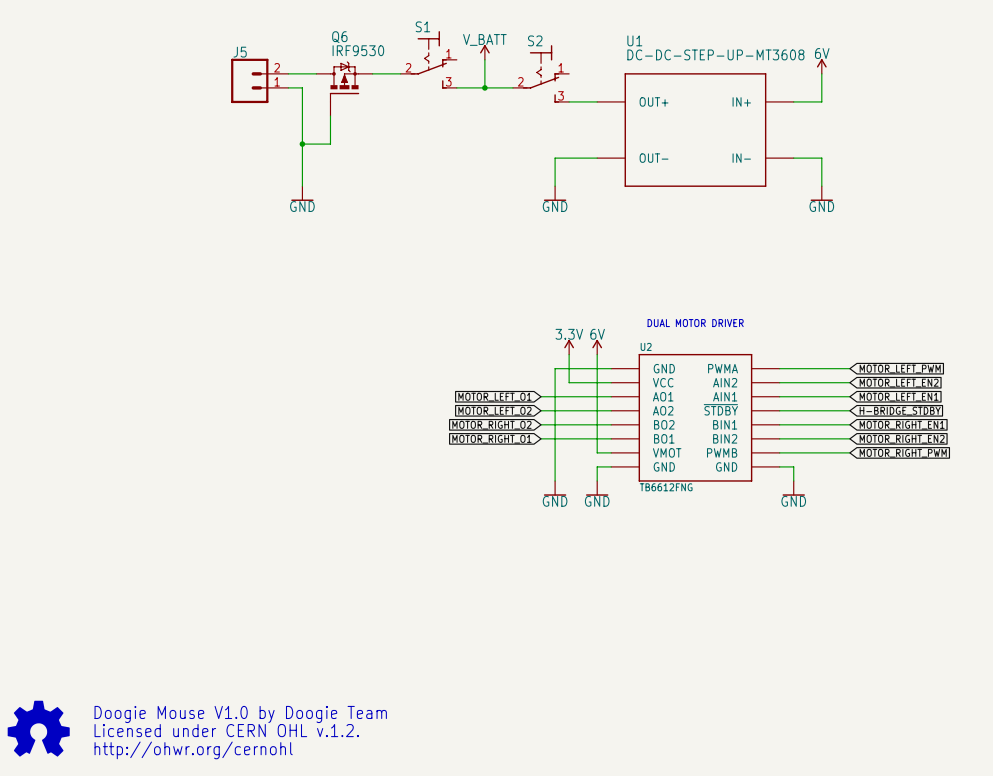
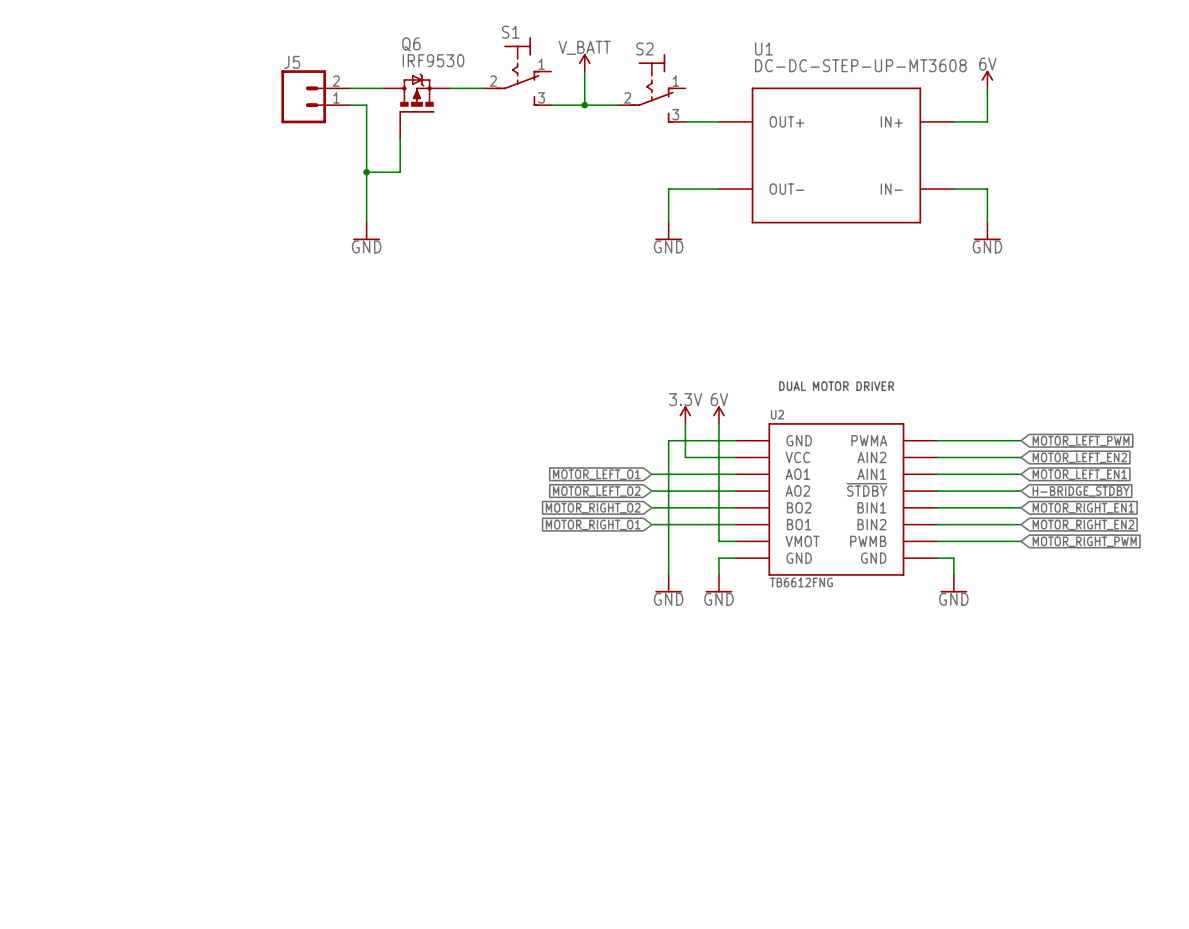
drawing: [7, 700, 70, 757] -> none
text: Doogie Mouse V1.0 by Doogie Team (240, 714) -> none
text: Licensed under CERN OHL v.1.2. (226, 730) -> none
text: http://ohwr.org/cernohl (193, 750) -> none

